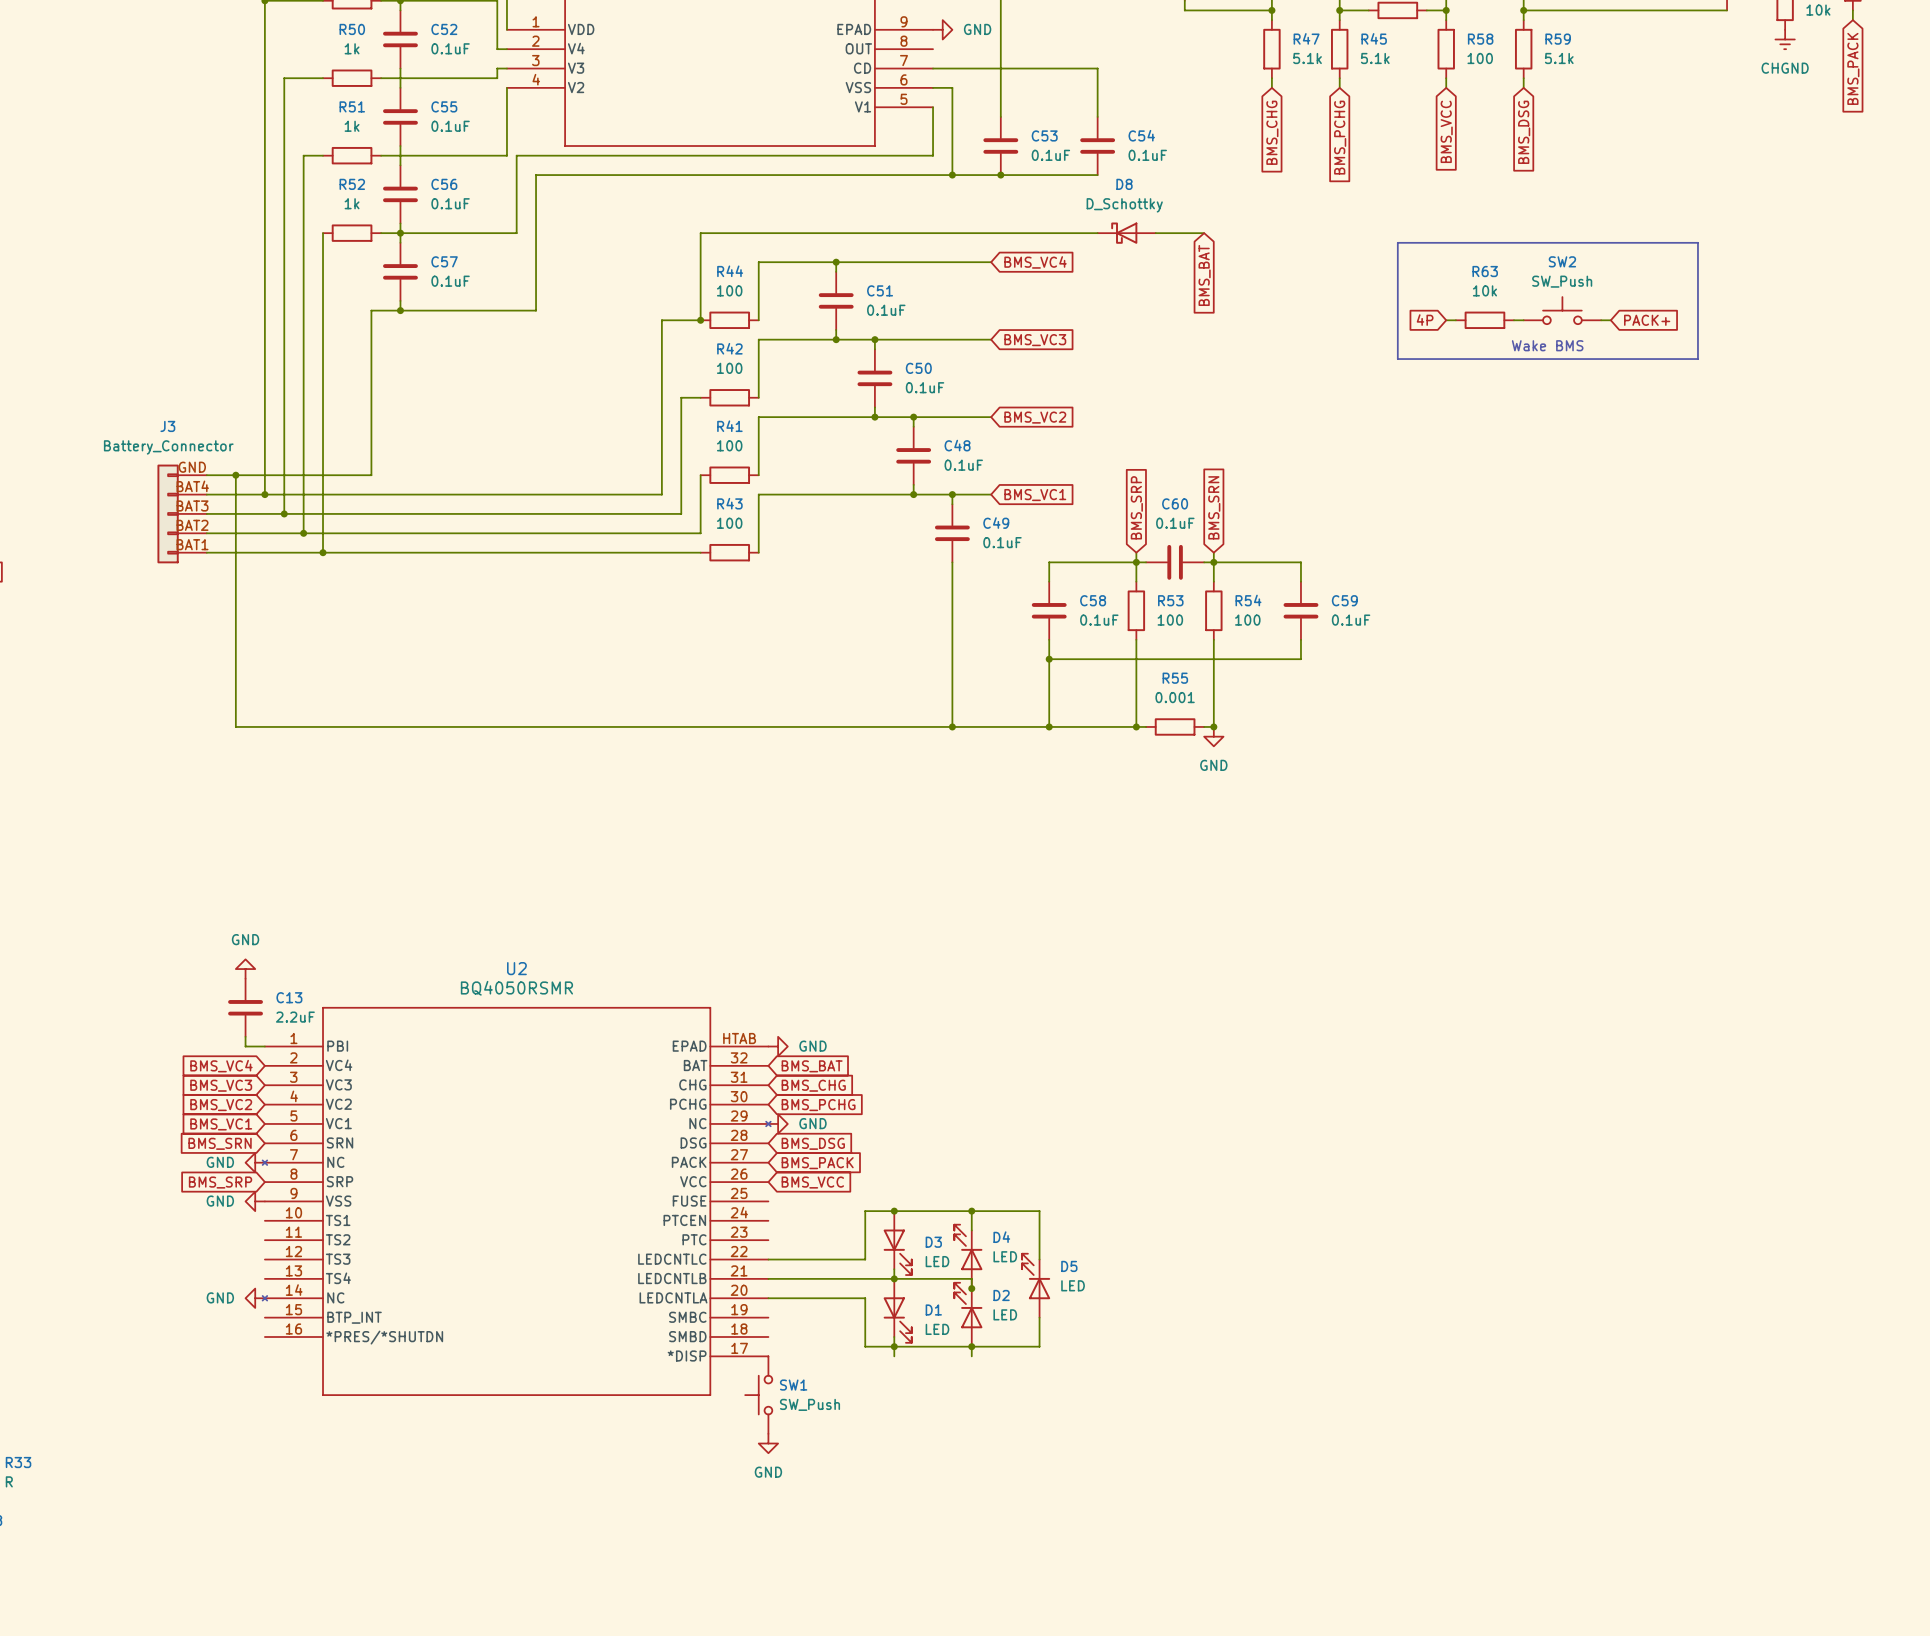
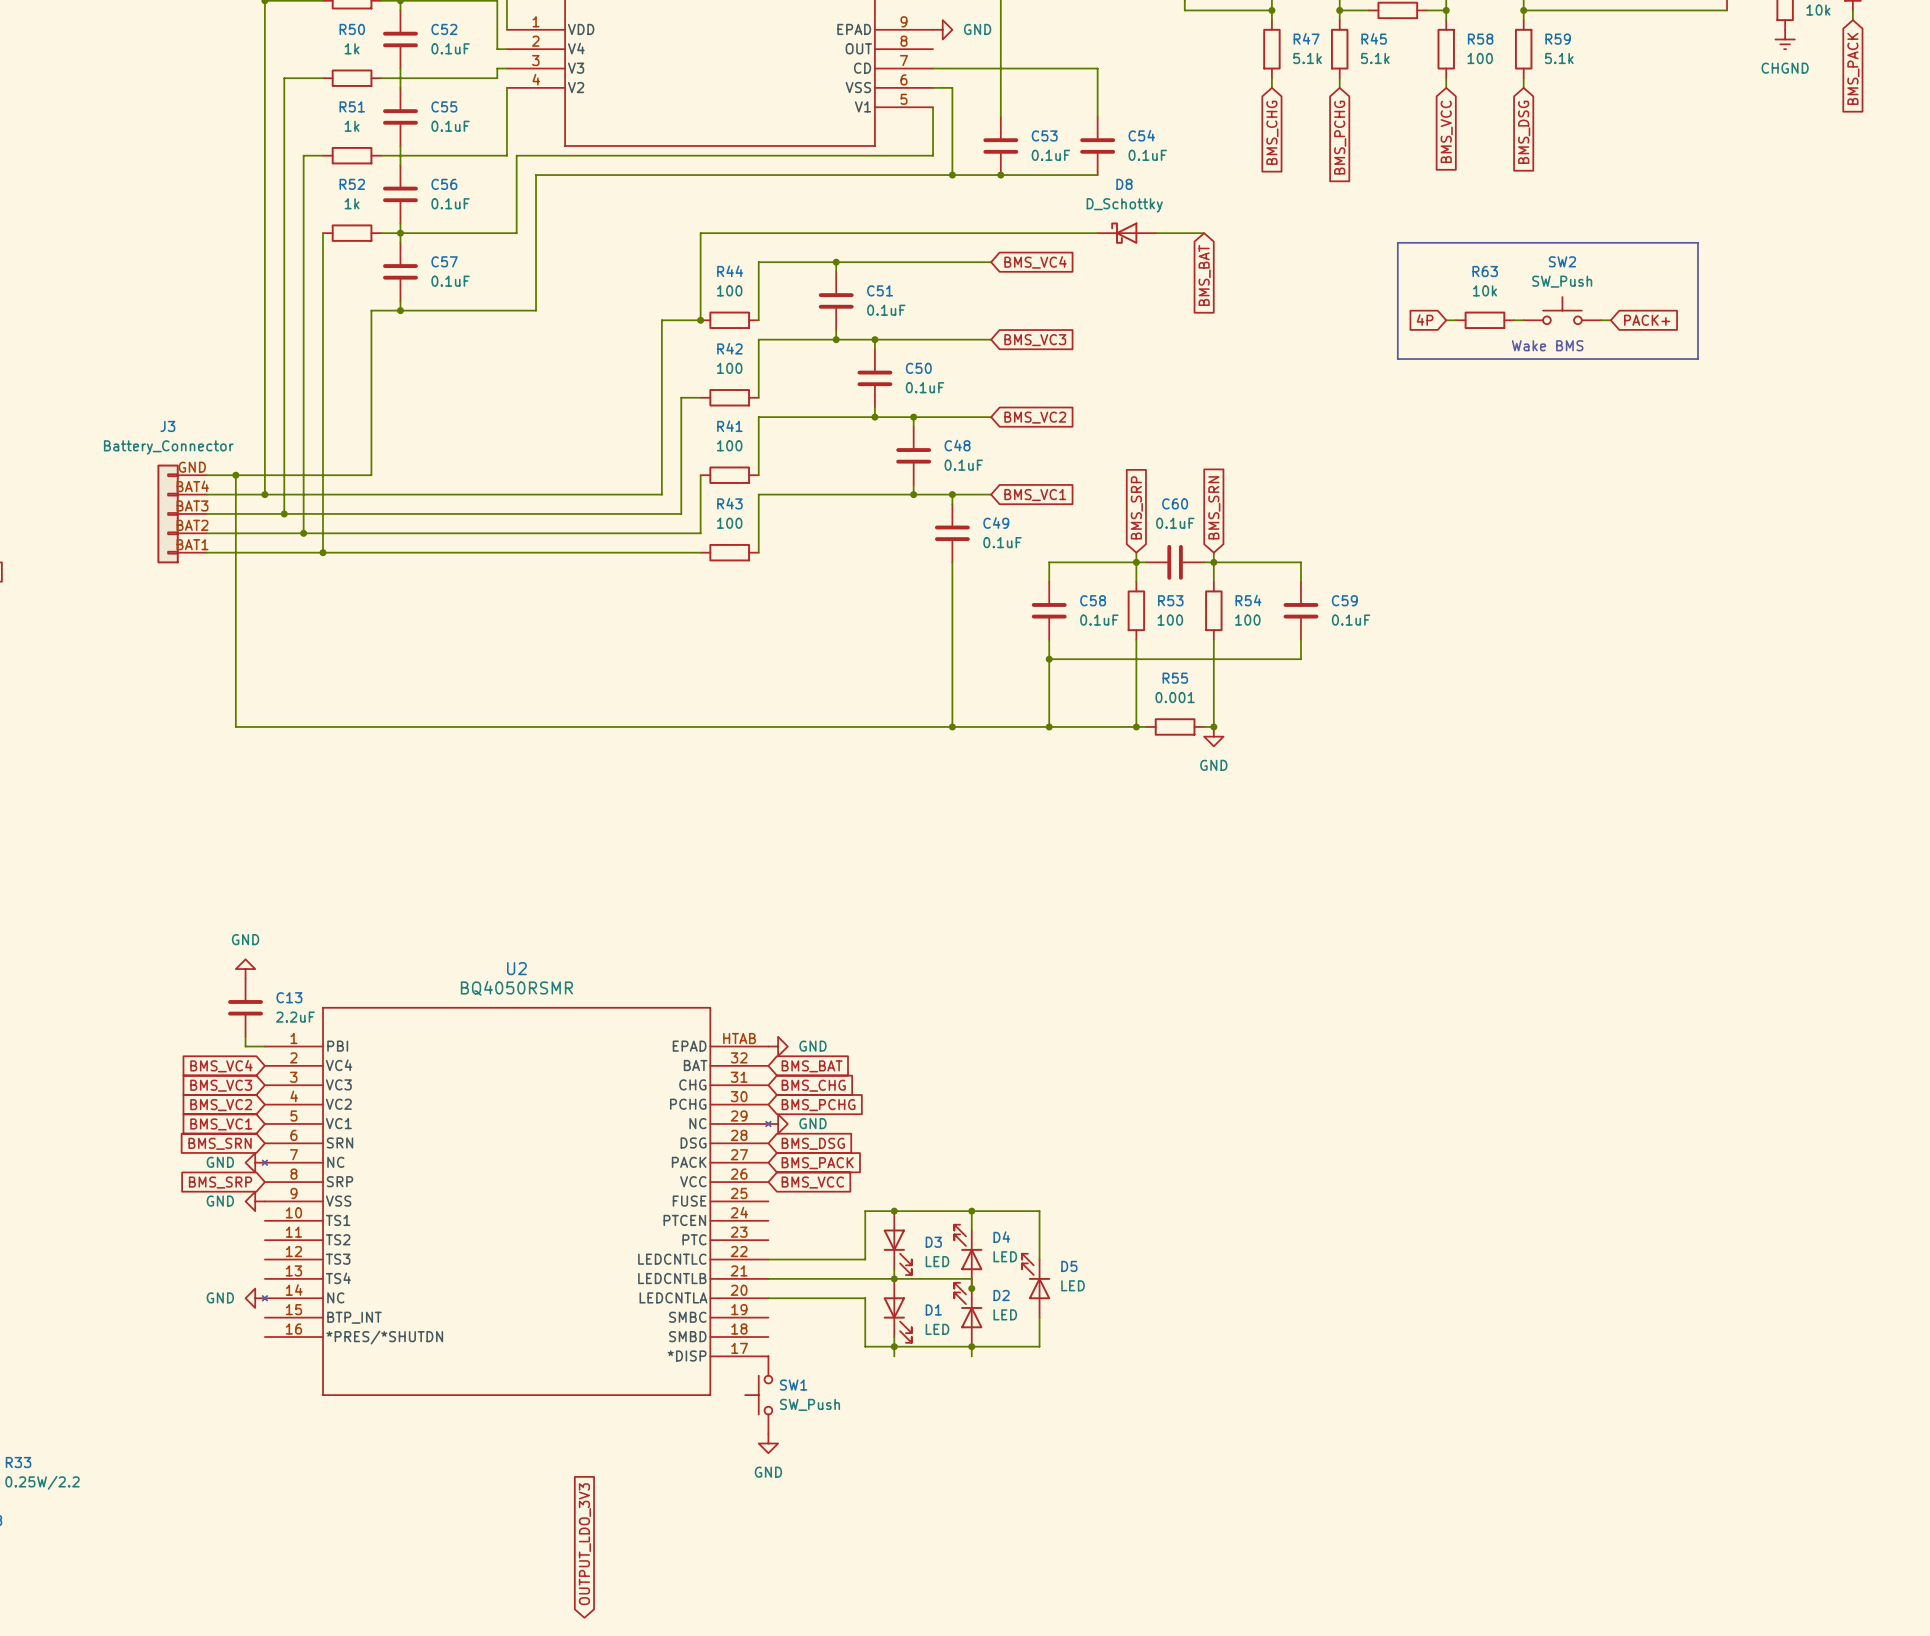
R33 value: R (9, 1481) -> 0.25W/2.2 (42, 1482)
global label: none -> OUTPUT_LDO_3V3 (584, 1544)

